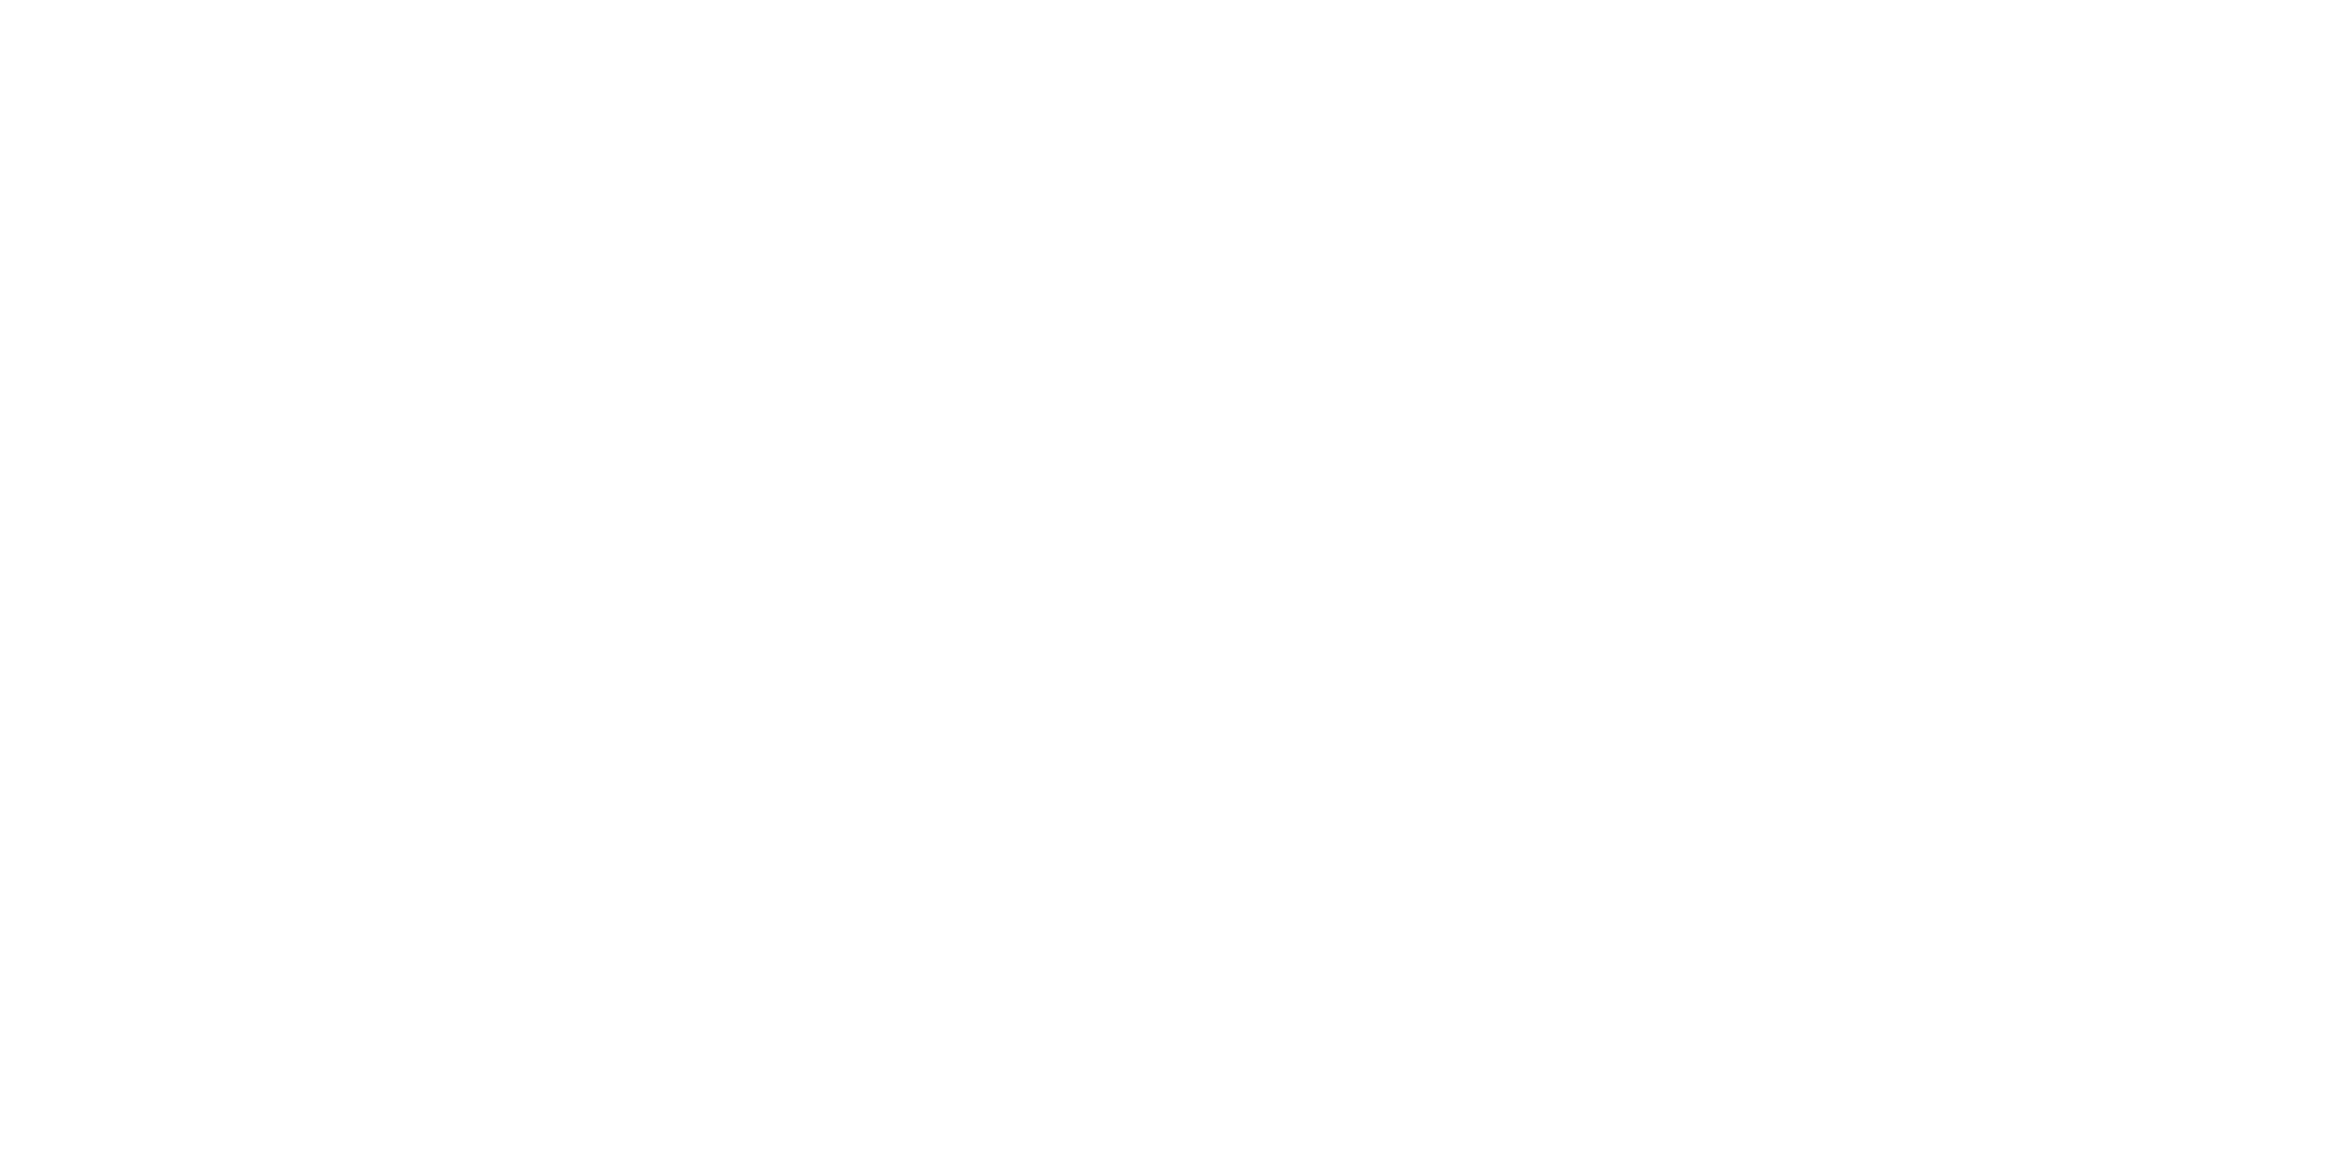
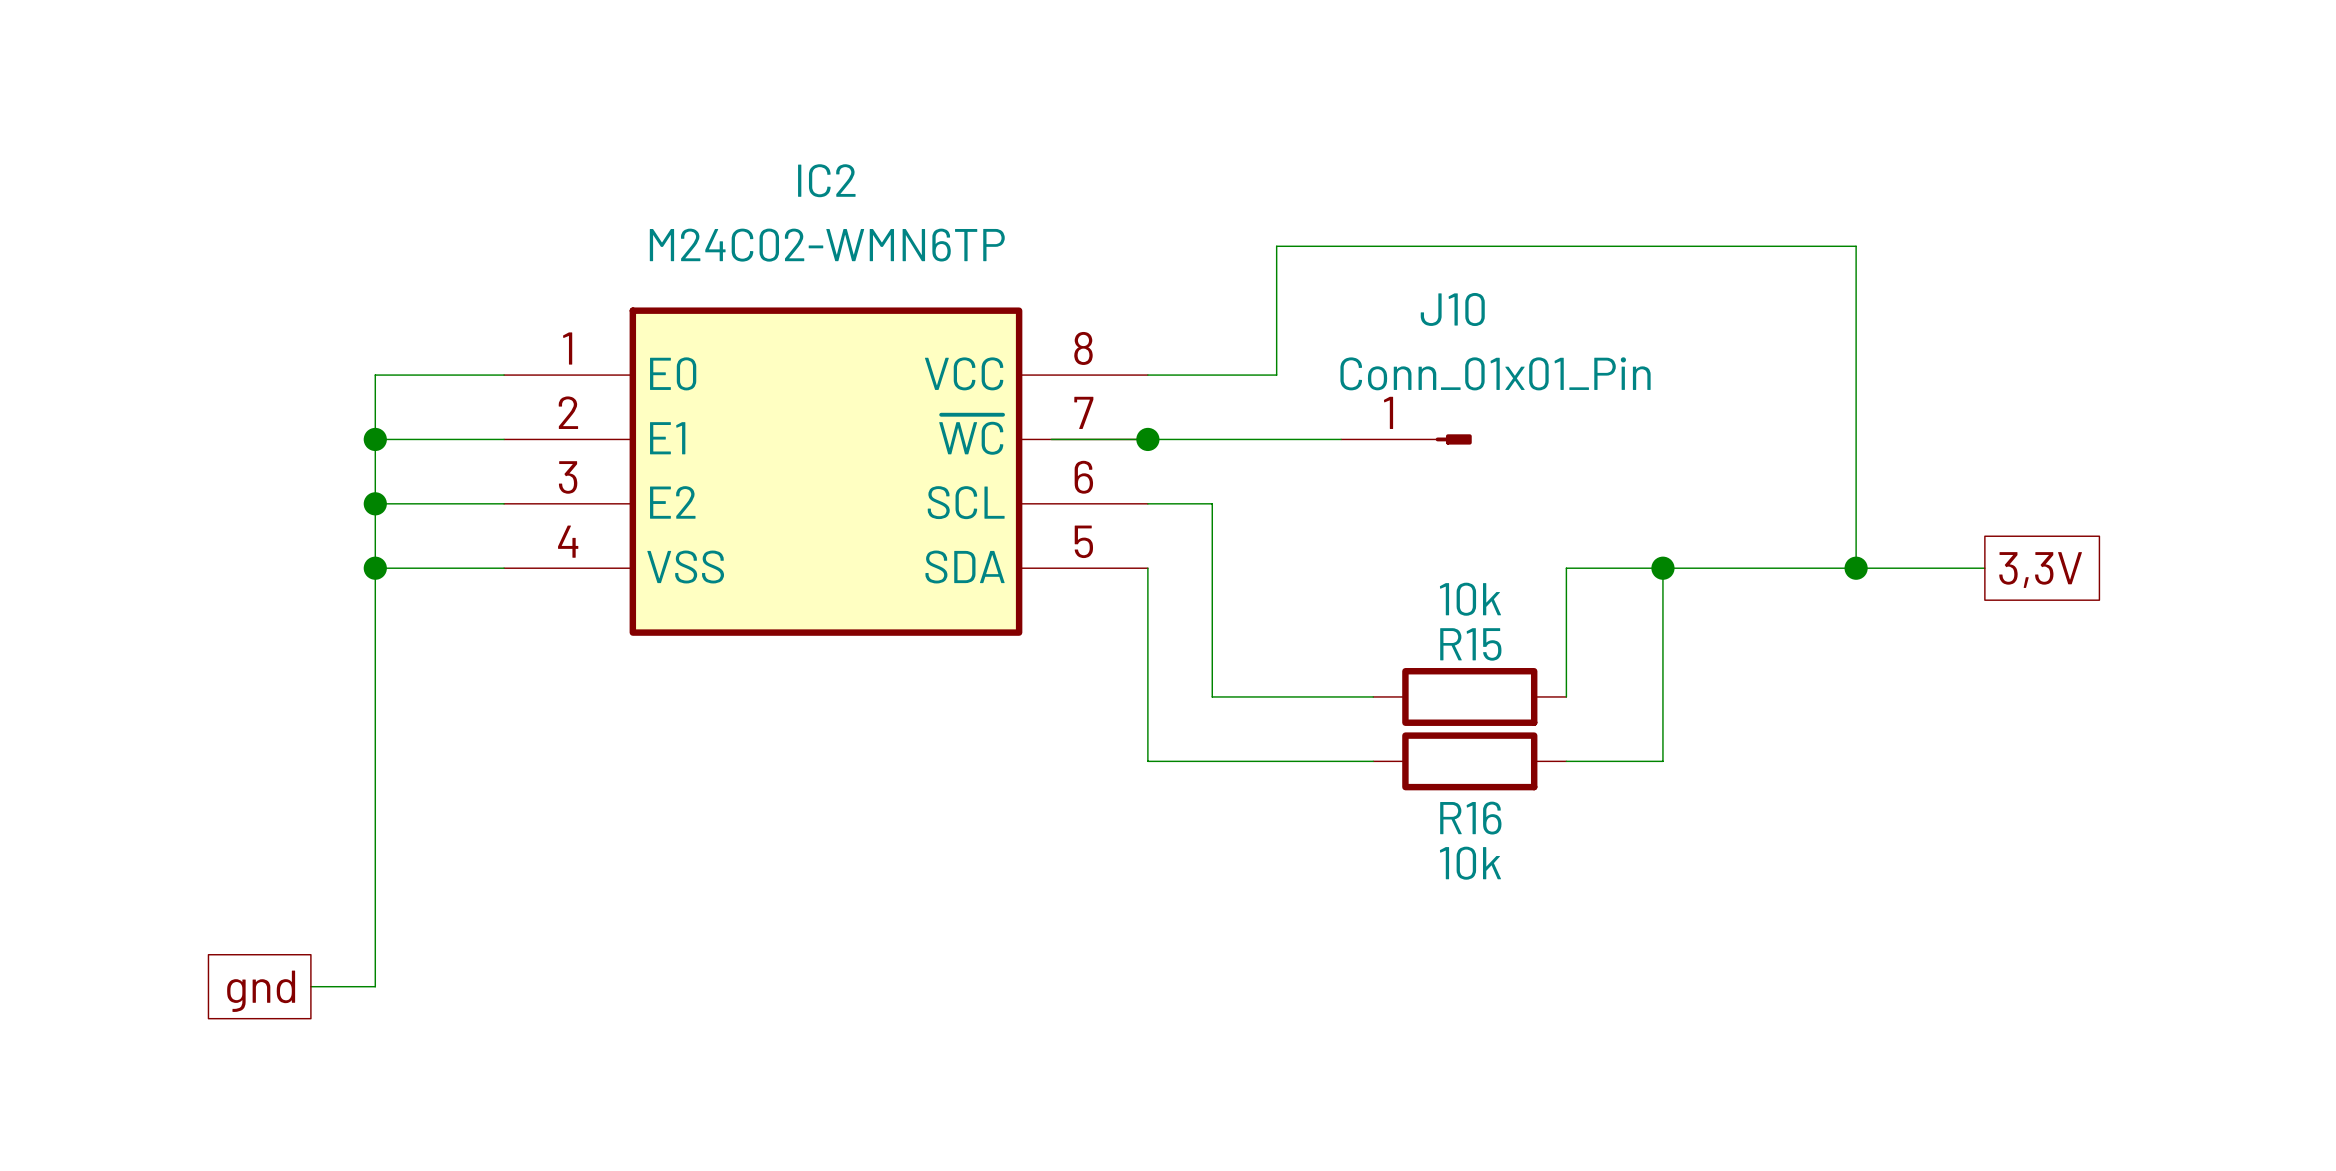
wire: none -> (504, 375) (375, 375) (375, 986) (310, 986)
wire: none -> (1147, 375) (1276, 375) (1276, 246) (1856, 246) (1856, 568)
wire: none -> (375, 439) (504, 439)
junction: none -> (375, 439)
wire: none -> (1051, 439) (1341, 439)
junction: none -> (1147, 439)
J10: none -> Conn_01x01_Pin (1406, 439)
IC2: none -> M24C02-WMN6TP (825, 471)
wire: none -> (375, 503) (504, 503)
junction: none -> (375, 503)
wire: none -> (1147, 503) (1212, 503) (1212, 696) (1373, 696)
wire: none -> (375, 568) (504, 568)
junction: none -> (375, 568)
wire: none -> (1147, 568) (1147, 761) (1373, 761)
wire: none -> (1662, 568) (1662, 761) (1566, 761)
junction: none -> (1662, 568)
junction: none -> (1856, 568)
wire: none -> (1984, 568) (1566, 568) (1566, 696)
global label: none -> 3,3V (2040, 570)
R15: none -> 10k (1469, 696)
R16: none -> 10k (1469, 761)
global label: none -> gnd (261, 991)

